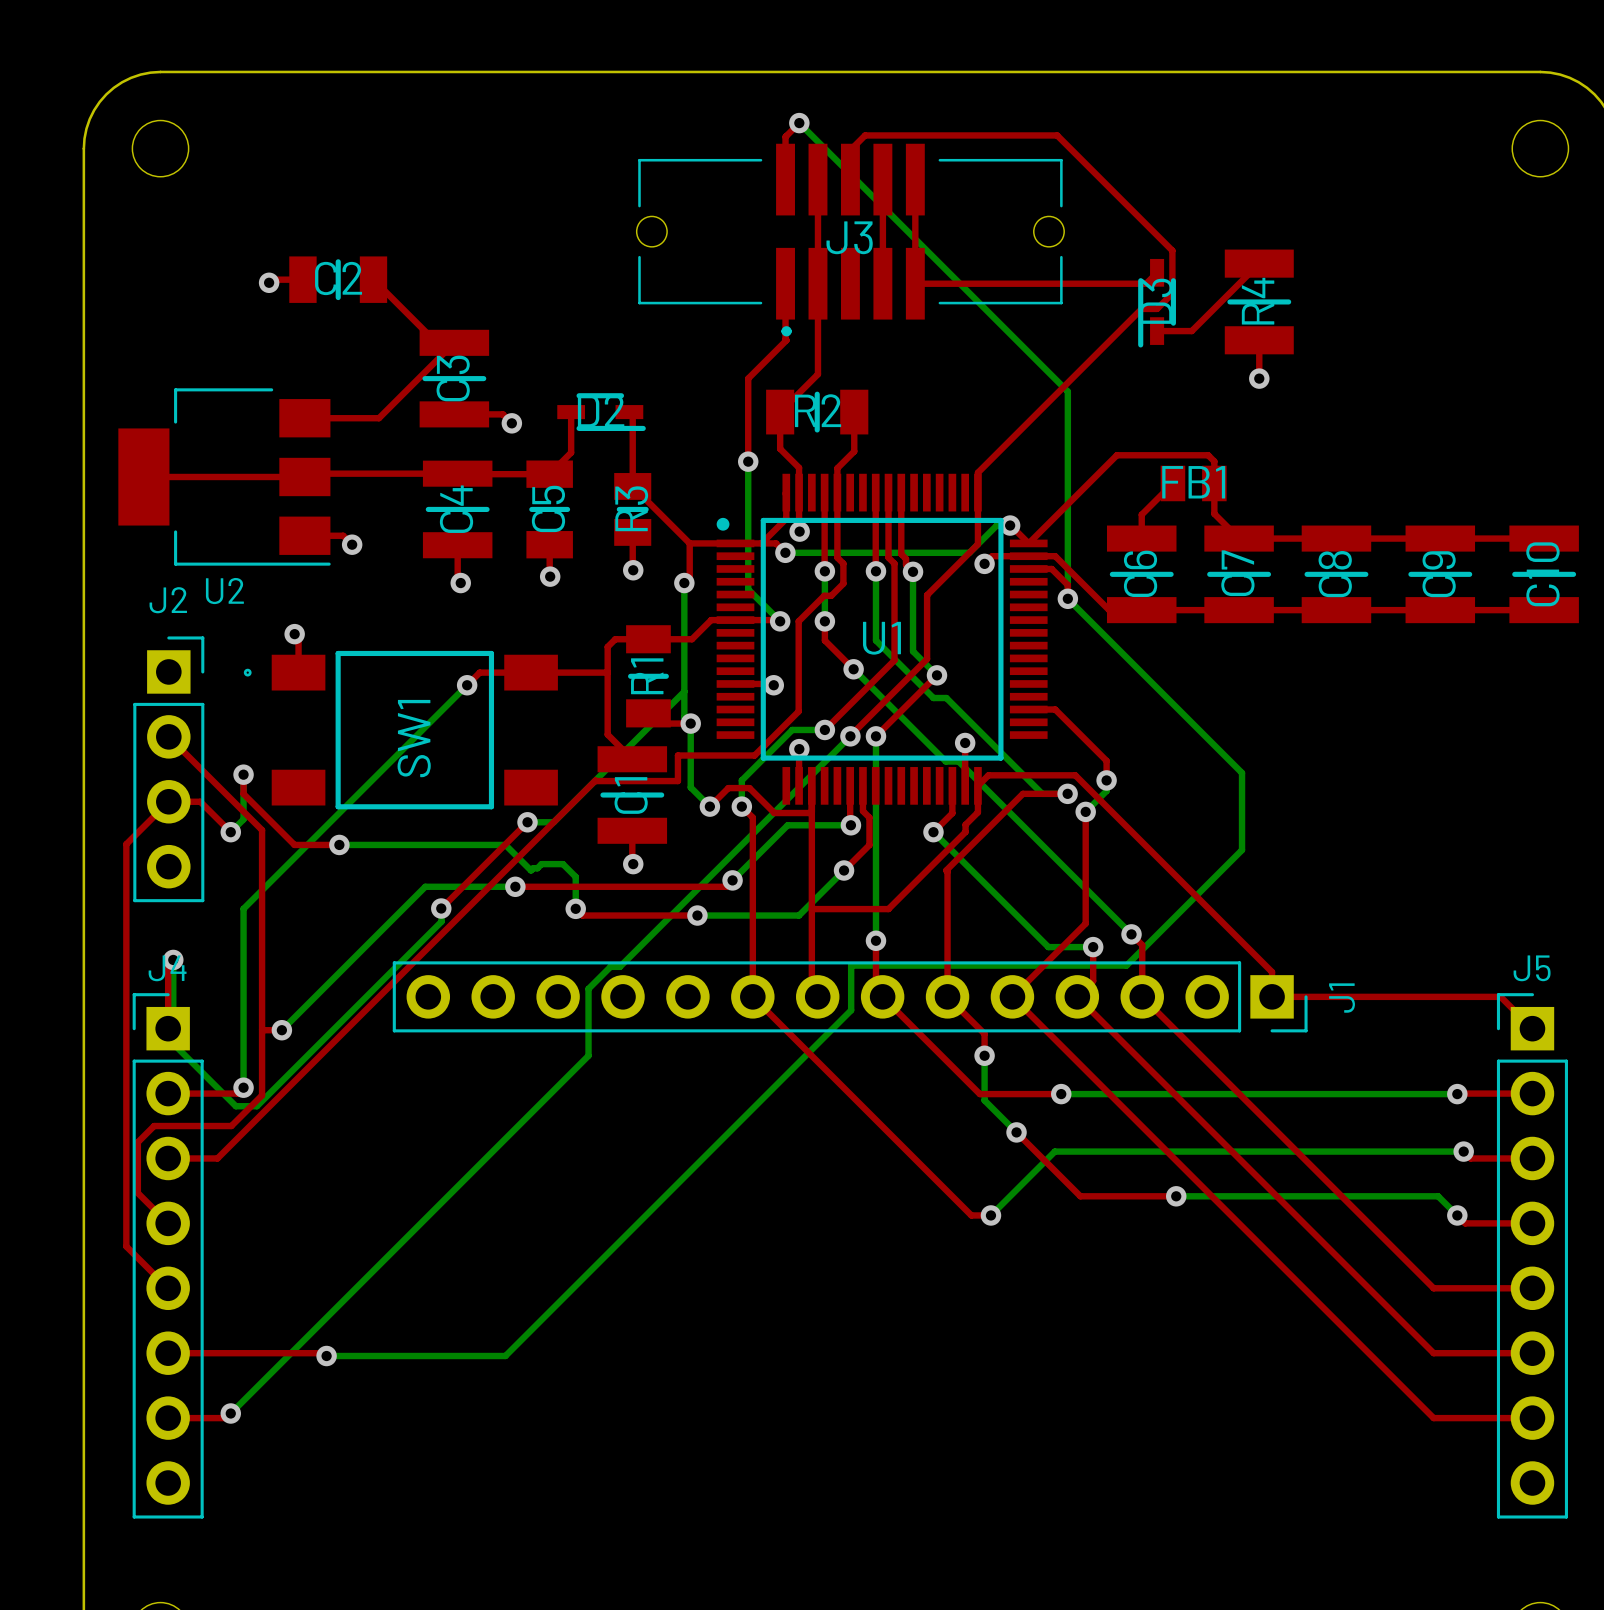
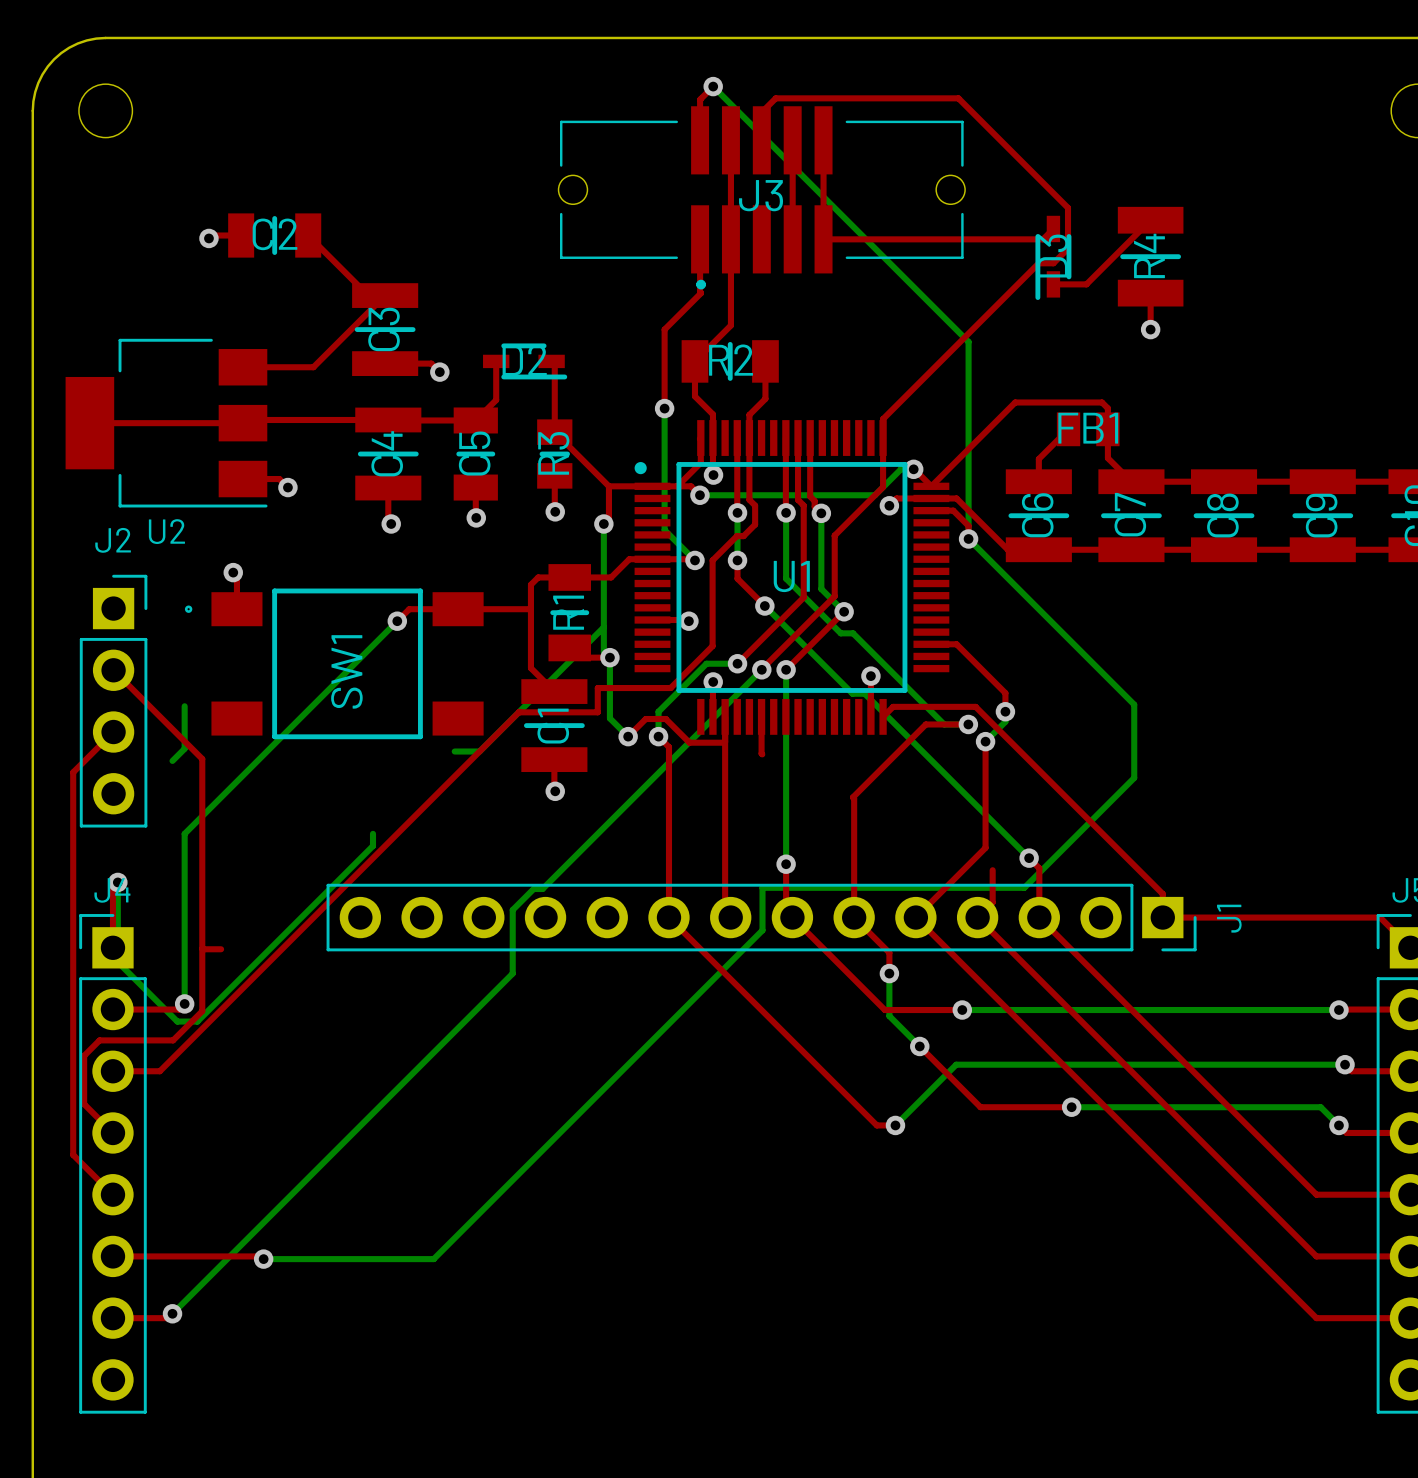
top track: (243, 774) (243, 793) (294, 844) (339, 844) -> none
via: (243, 774) -> none
top track: (862, 785) (862, 811) (869, 817) (869, 845) (844, 870) -> none
top track: (952, 785) (952, 813) (933, 832) -> none
top track: (977, 785) (977, 812) (965, 824) (965, 832) (888, 909) (811, 909) -> none
top track: (168, 801) (200, 801) (230, 832) -> none
top track: (527, 822) (441, 908) -> none
via: (527, 822) -> none
bottom track: (850, 825) (787, 825) (732, 880) -> none
via: (850, 825) -> none
via: (230, 832) -> none
bottom track: (933, 832) (1048, 947) (1093, 947) -> none
via: (933, 832) -> none
bottom track: (339, 844) (505, 844) (531, 870) (541, 864) (562, 864) (575, 876) (575, 908) -> none
via: (339, 844) -> none
bottom track: (844, 870) (799, 915) (697, 915) -> none
via: (844, 870) -> none
top track: (732, 880) (726, 886) (515, 886) -> none
via: (732, 880) -> none
bottom track: (515, 886) (425, 886) (281, 1030) -> none
via: (515, 886) -> none
via: (441, 908) -> none
top track: (575, 908) (582, 915) (697, 915) -> none
via: (575, 908) -> none
via: (697, 915) -> none
via: (1093, 947) -> none
via: (281, 1030) -> none

